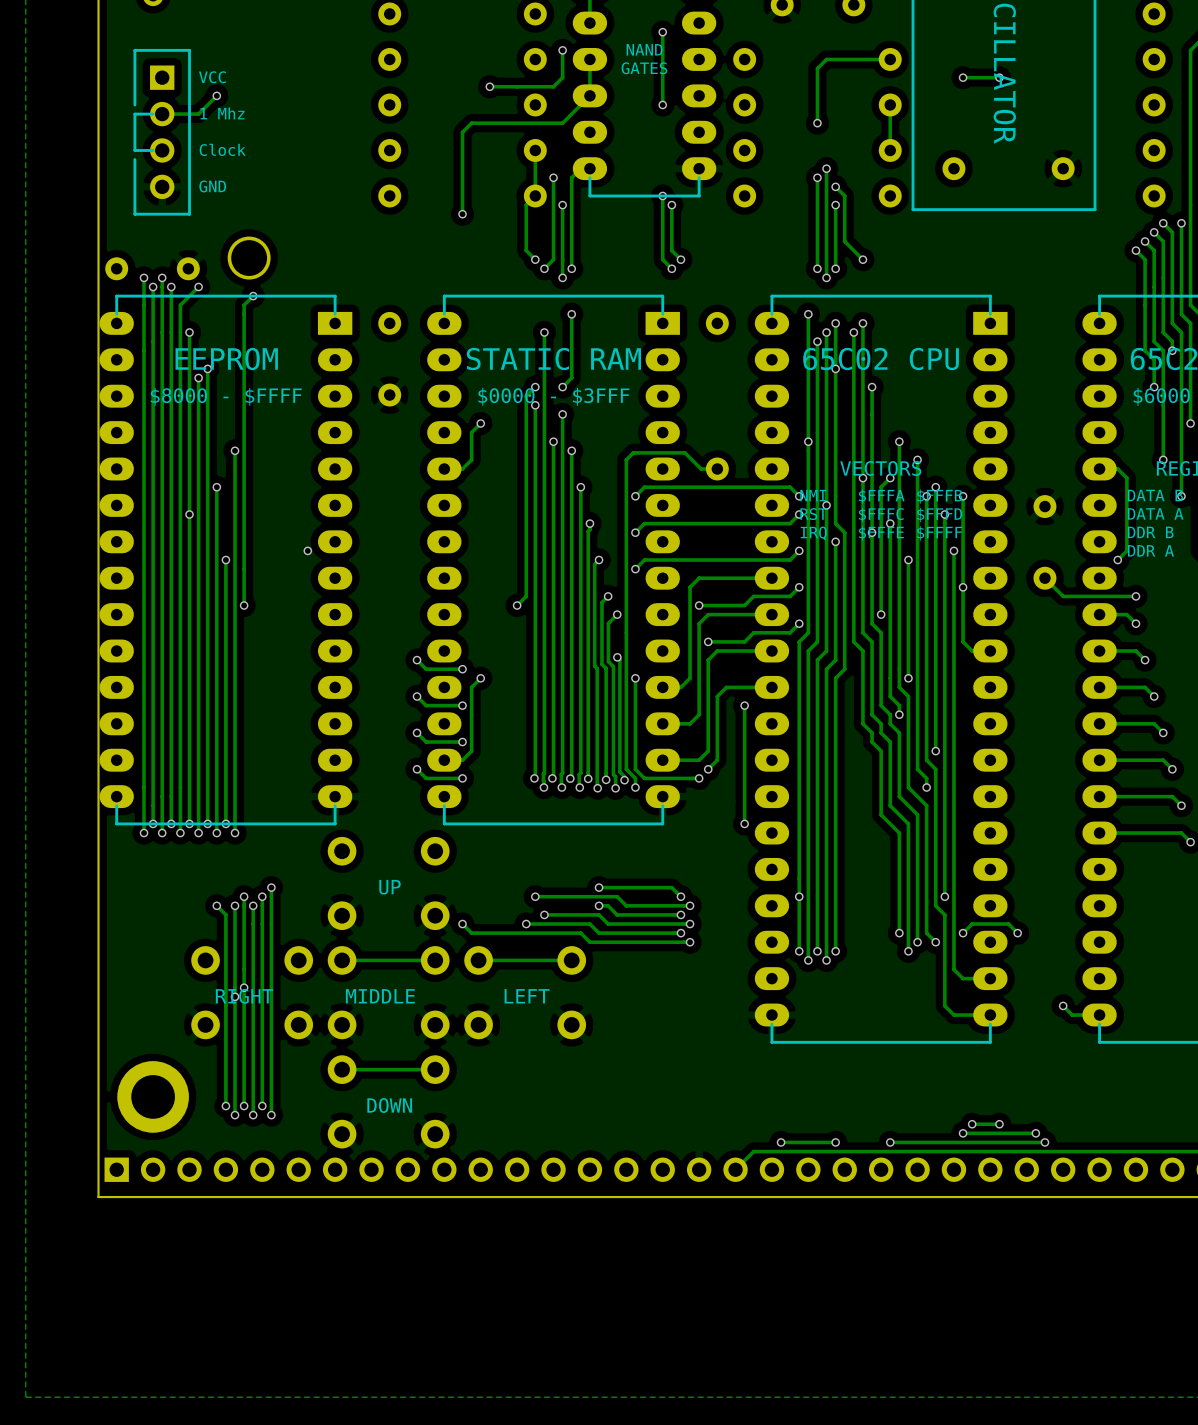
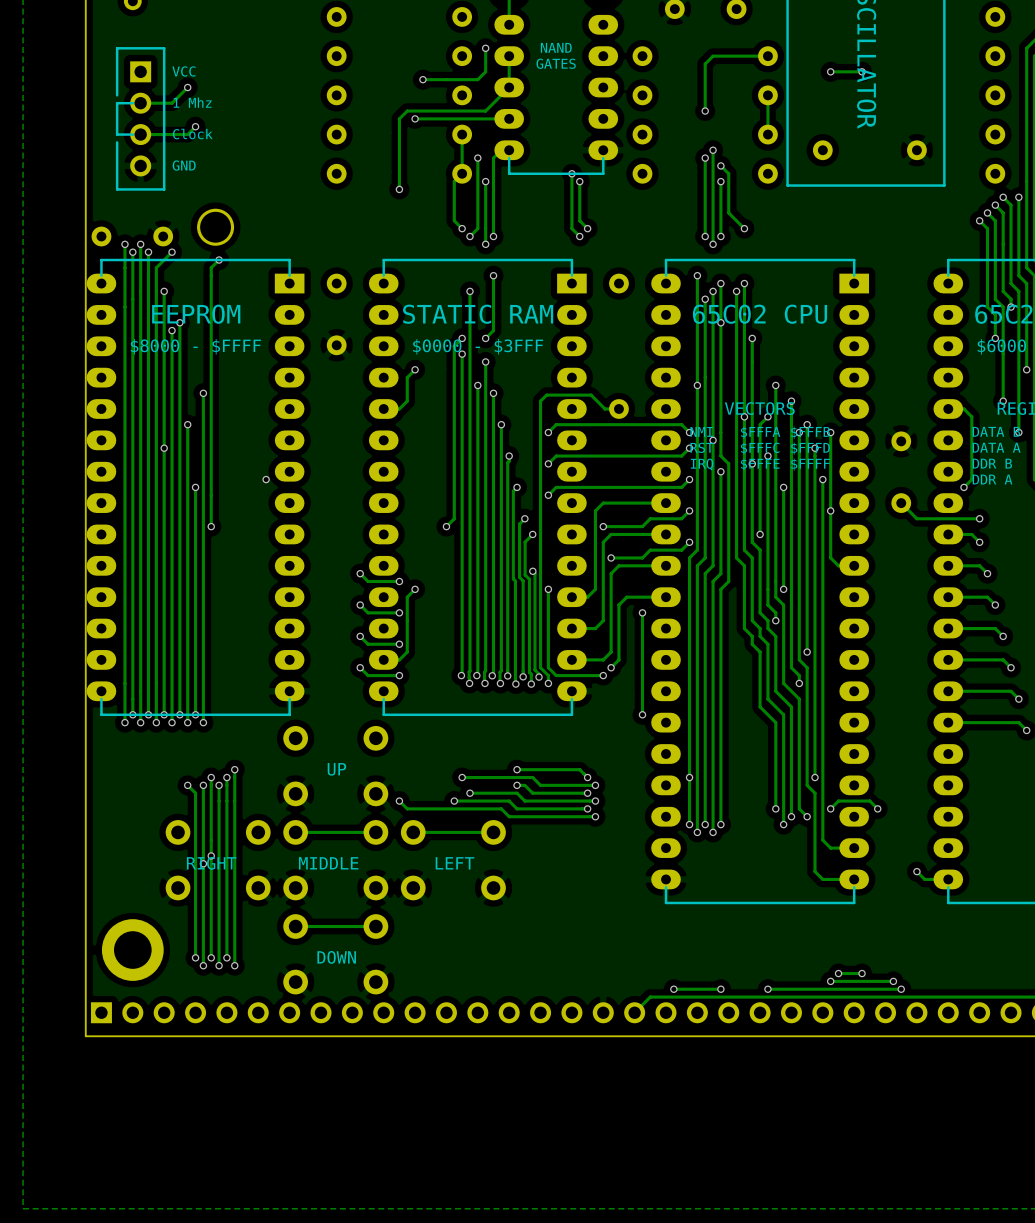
track: (662, 32) (662, 104) -> none
via: (662, 32) -> none
via: (662, 104) -> none
via: none -> (415, 118)
track: none -> (509, 118) (415, 118)
track: none -> (195, 126) (187, 134) (140, 134)
via: none -> (195, 126)

